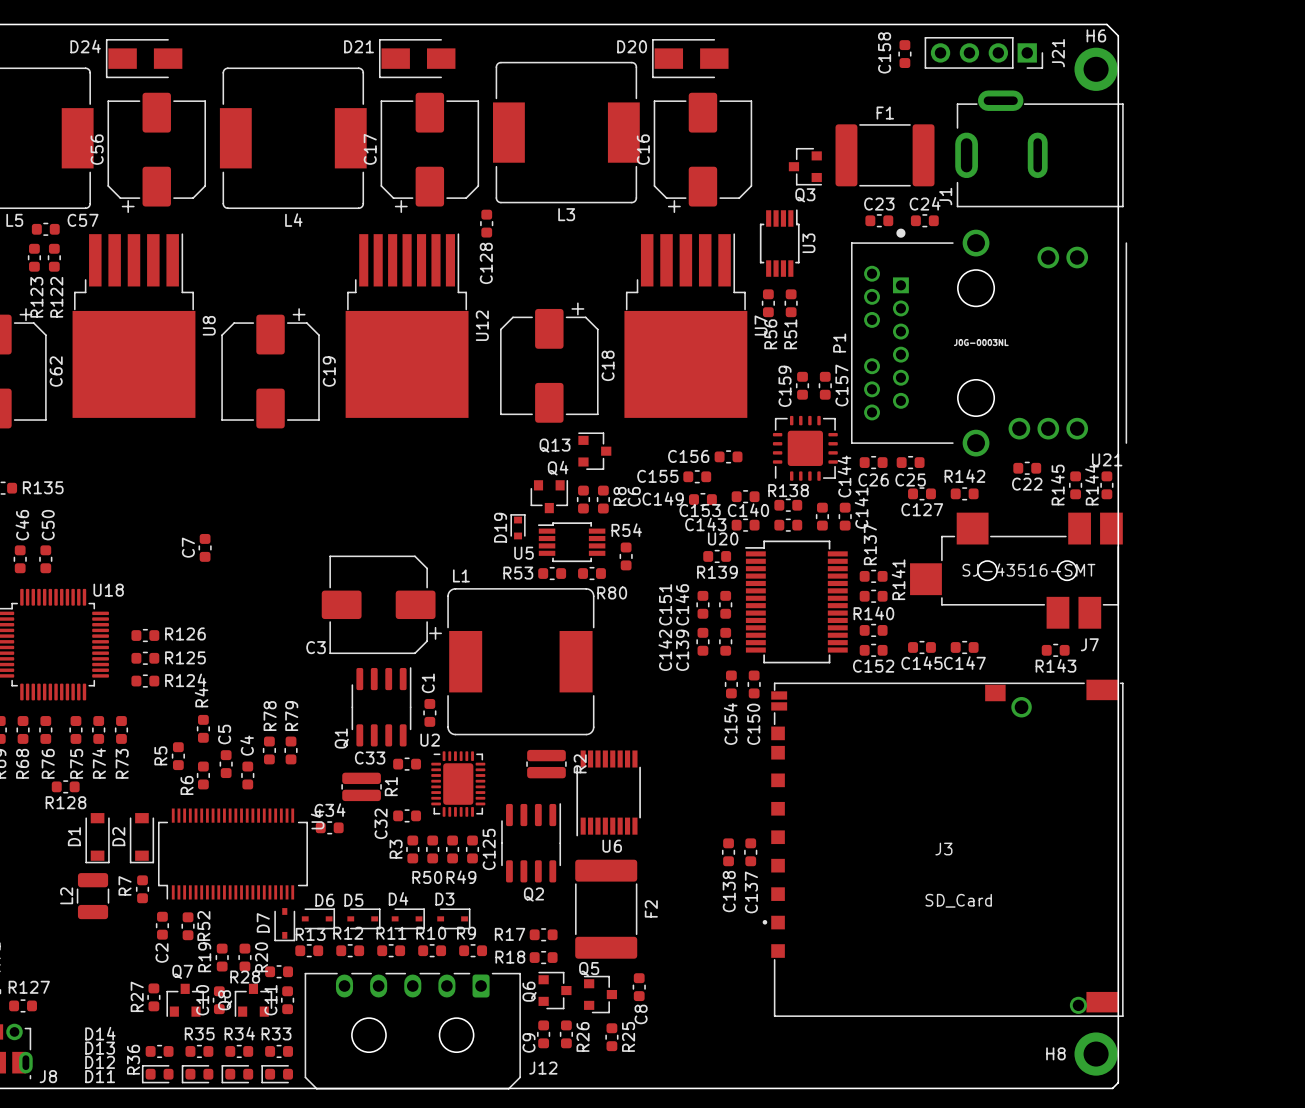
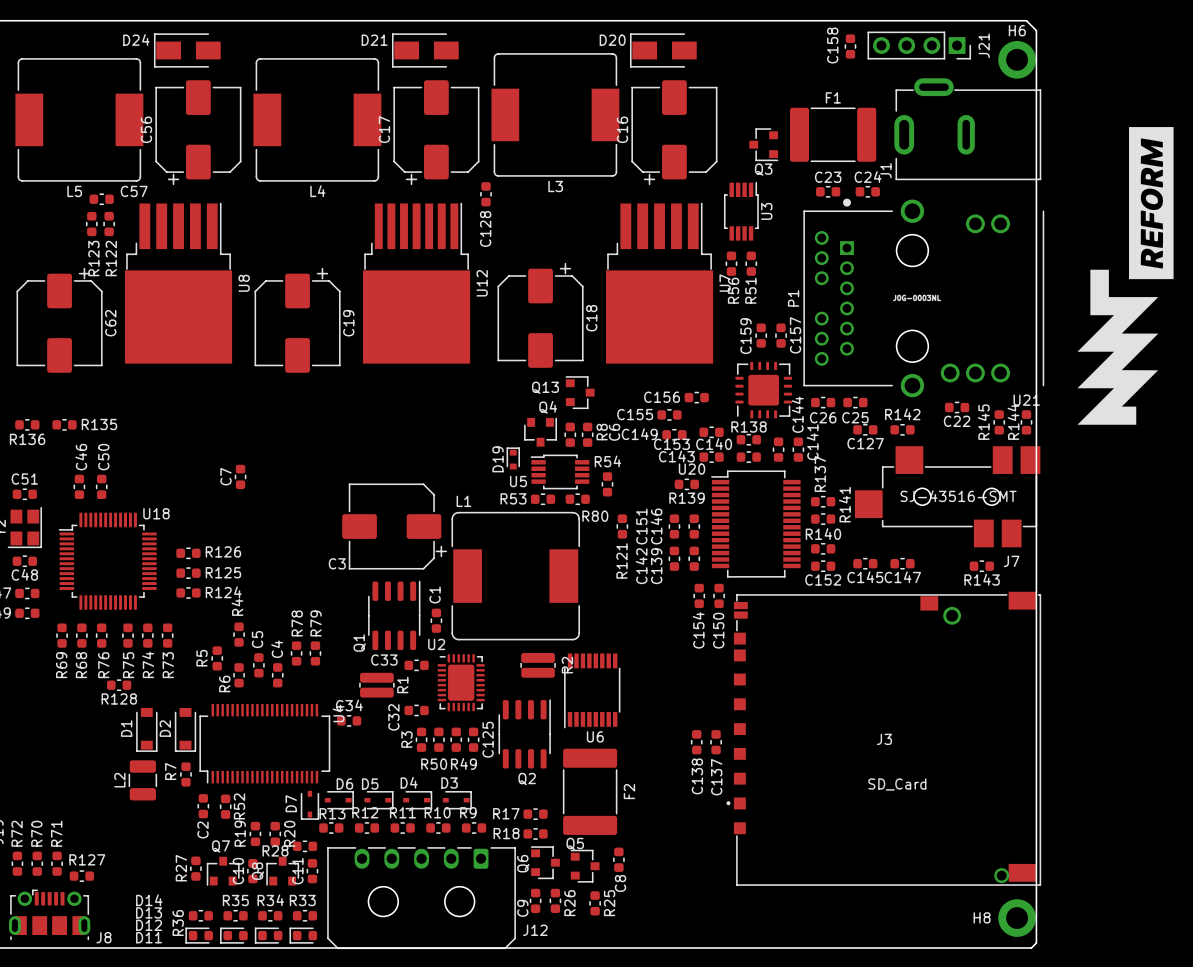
drawing: none -> [1077, 127, 1174, 425]
R121: none -> (622, 526)

